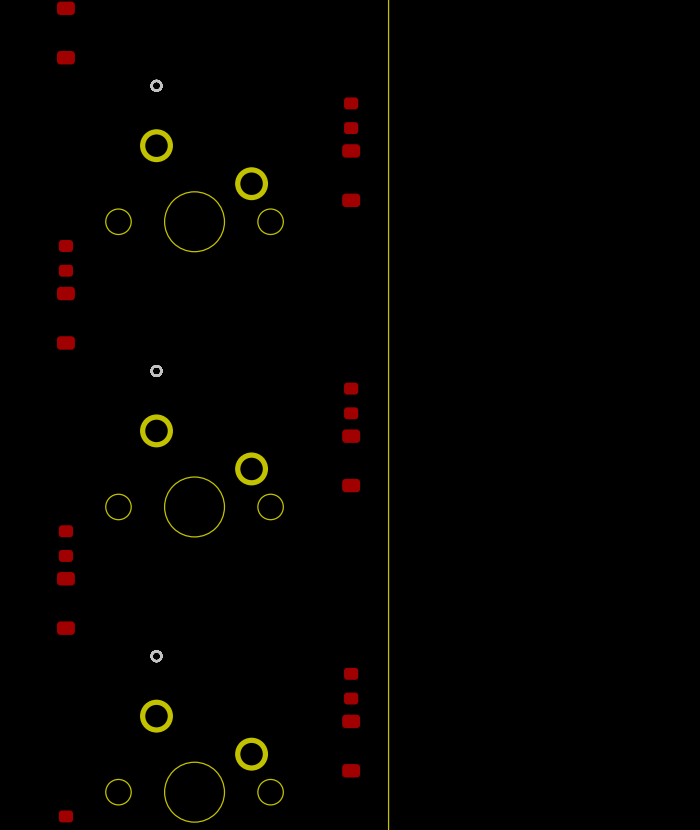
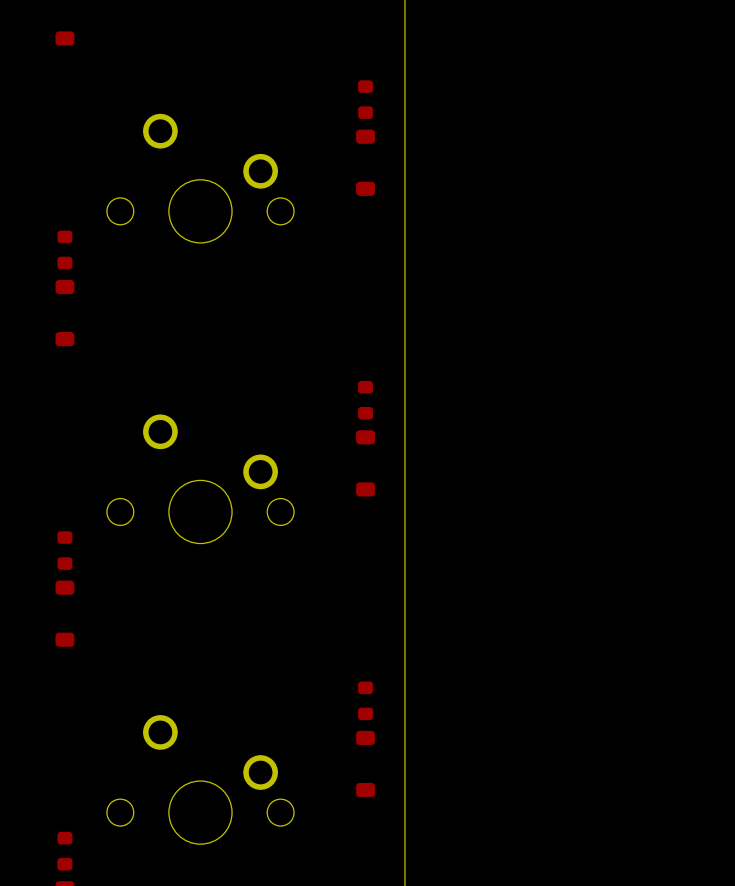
via: (156, 85) -> none
via: (156, 371) -> none
via: (156, 656) -> none

